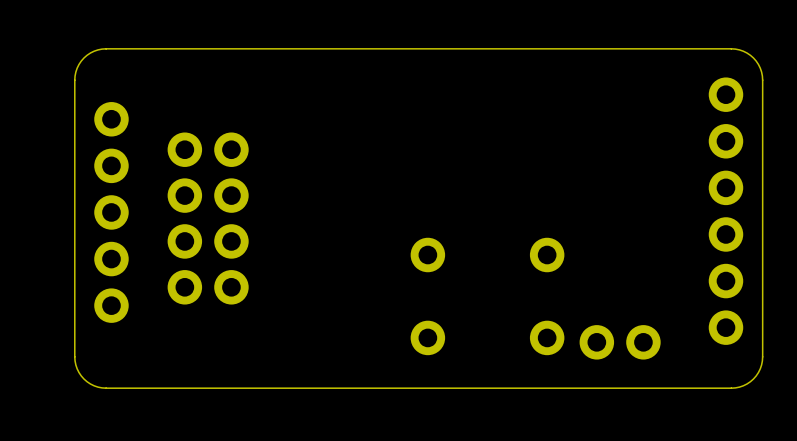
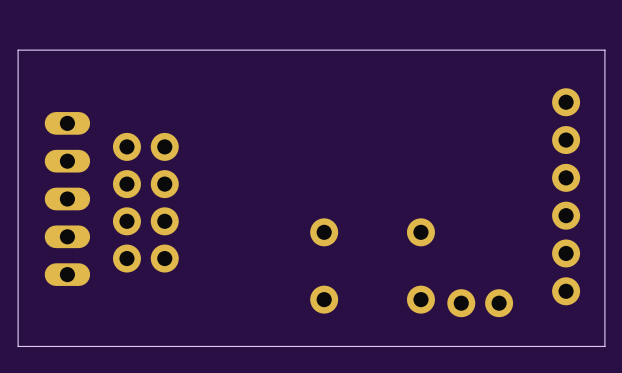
board edge: (731, 48) (106, 48) (94, 51) (83, 58) (78, 64) (74, 80) (74, 356) (77, 368) (83, 379) (90, 383) (106, 388) (731, 388) (743, 385) (753, 379) (758, 372) (762, 356) (762, 80) (760, 68) (753, 58) (743, 51) (731, 48) -> (604, 50) (604, 346) (18, 346) (18, 50) (604, 50)
part footprint: [94, 102, 129, 323] -> [44, 112, 91, 286]

